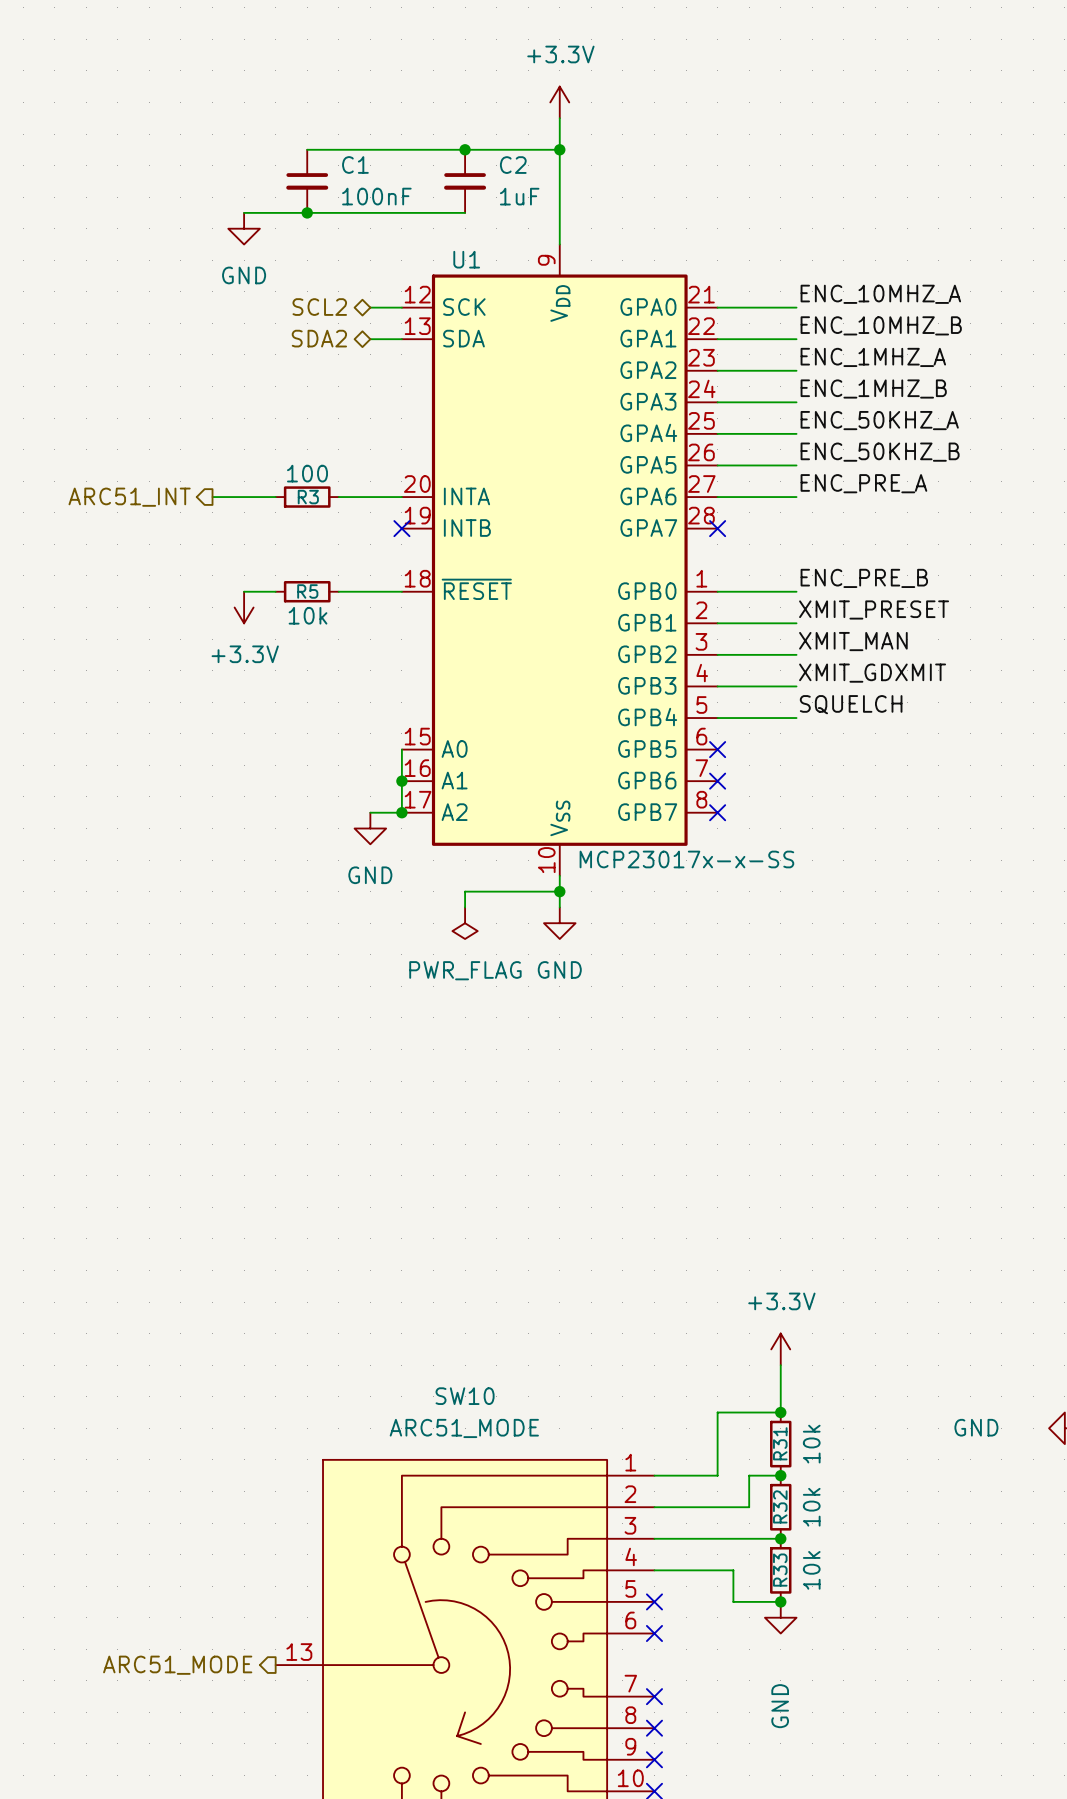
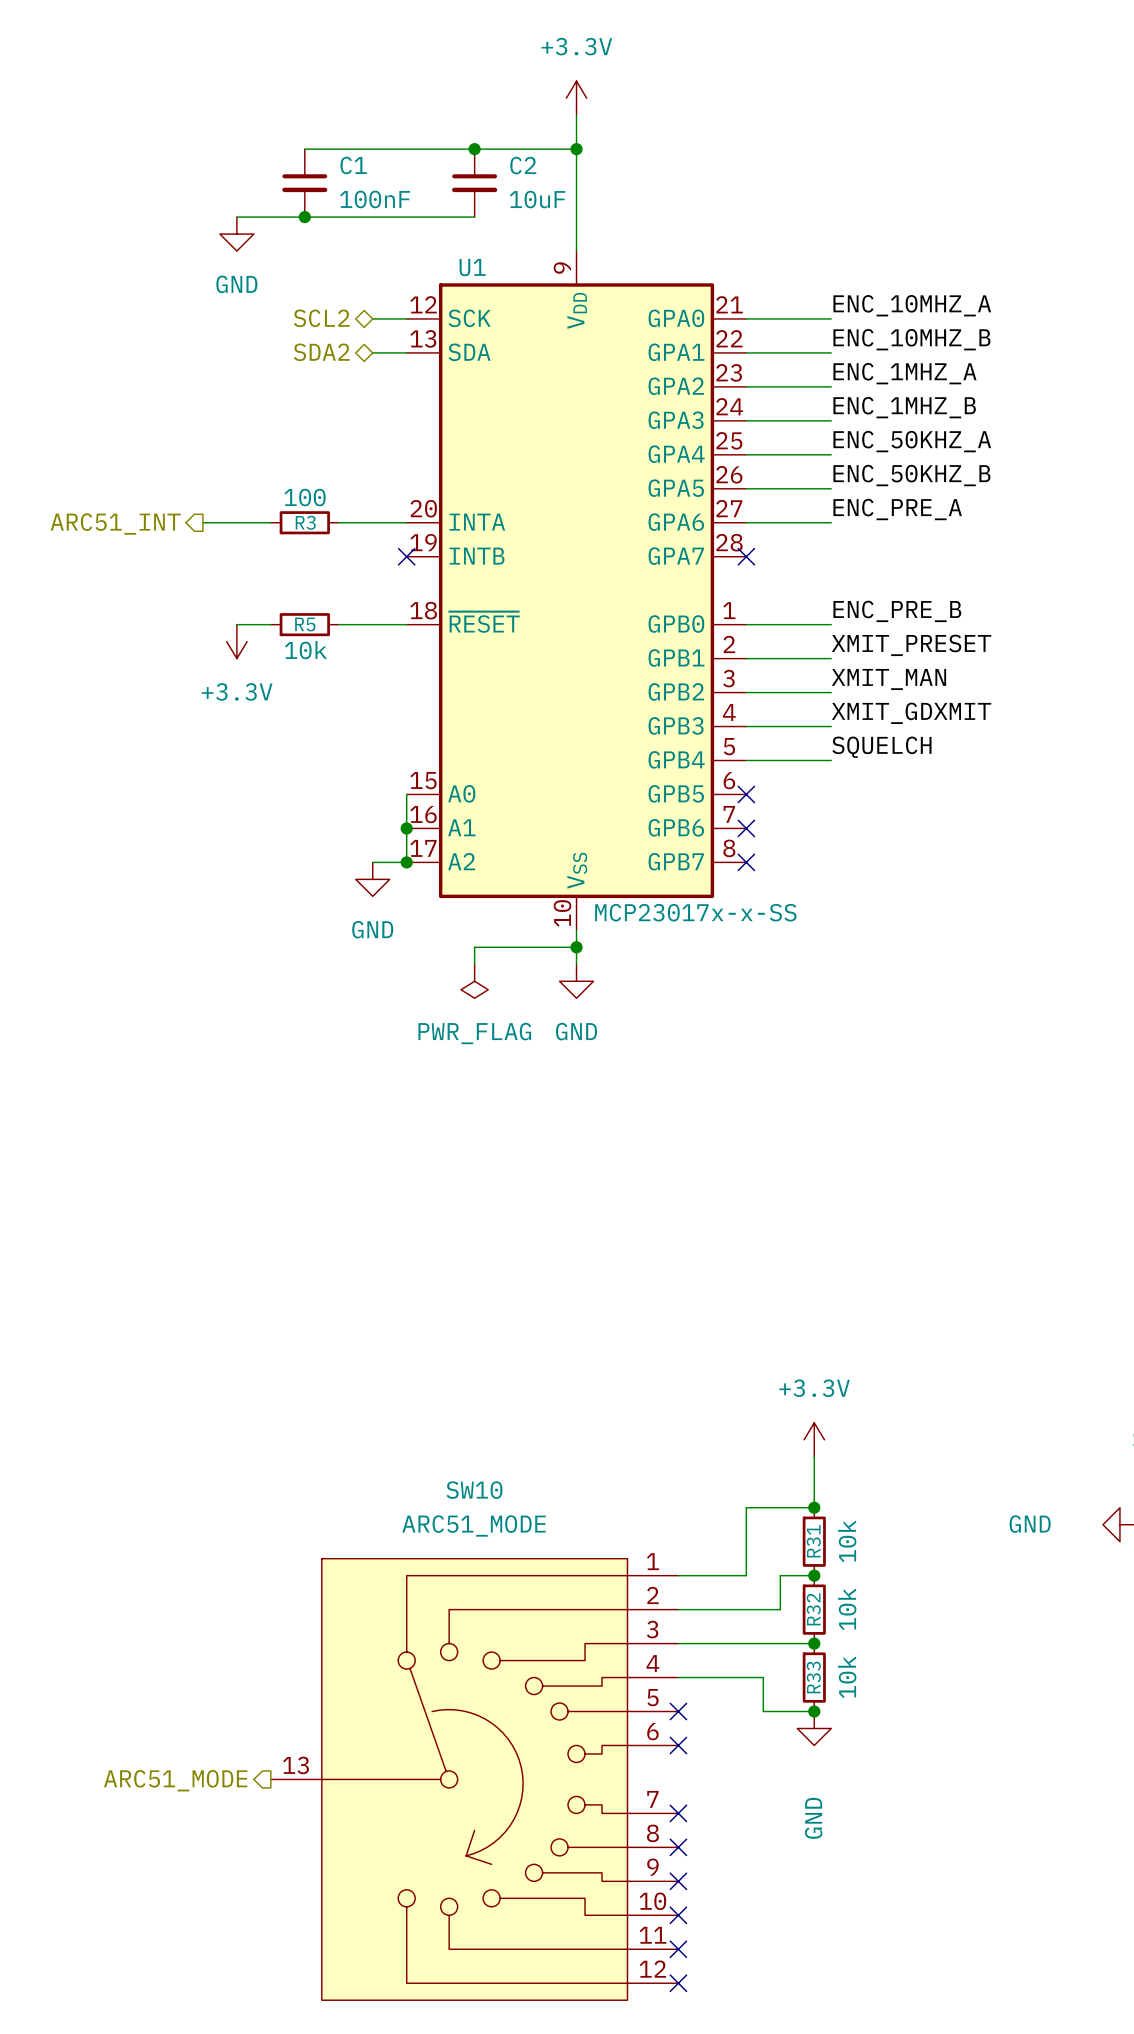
C2 value: 1uF (519, 196) -> 10uF (537, 199)

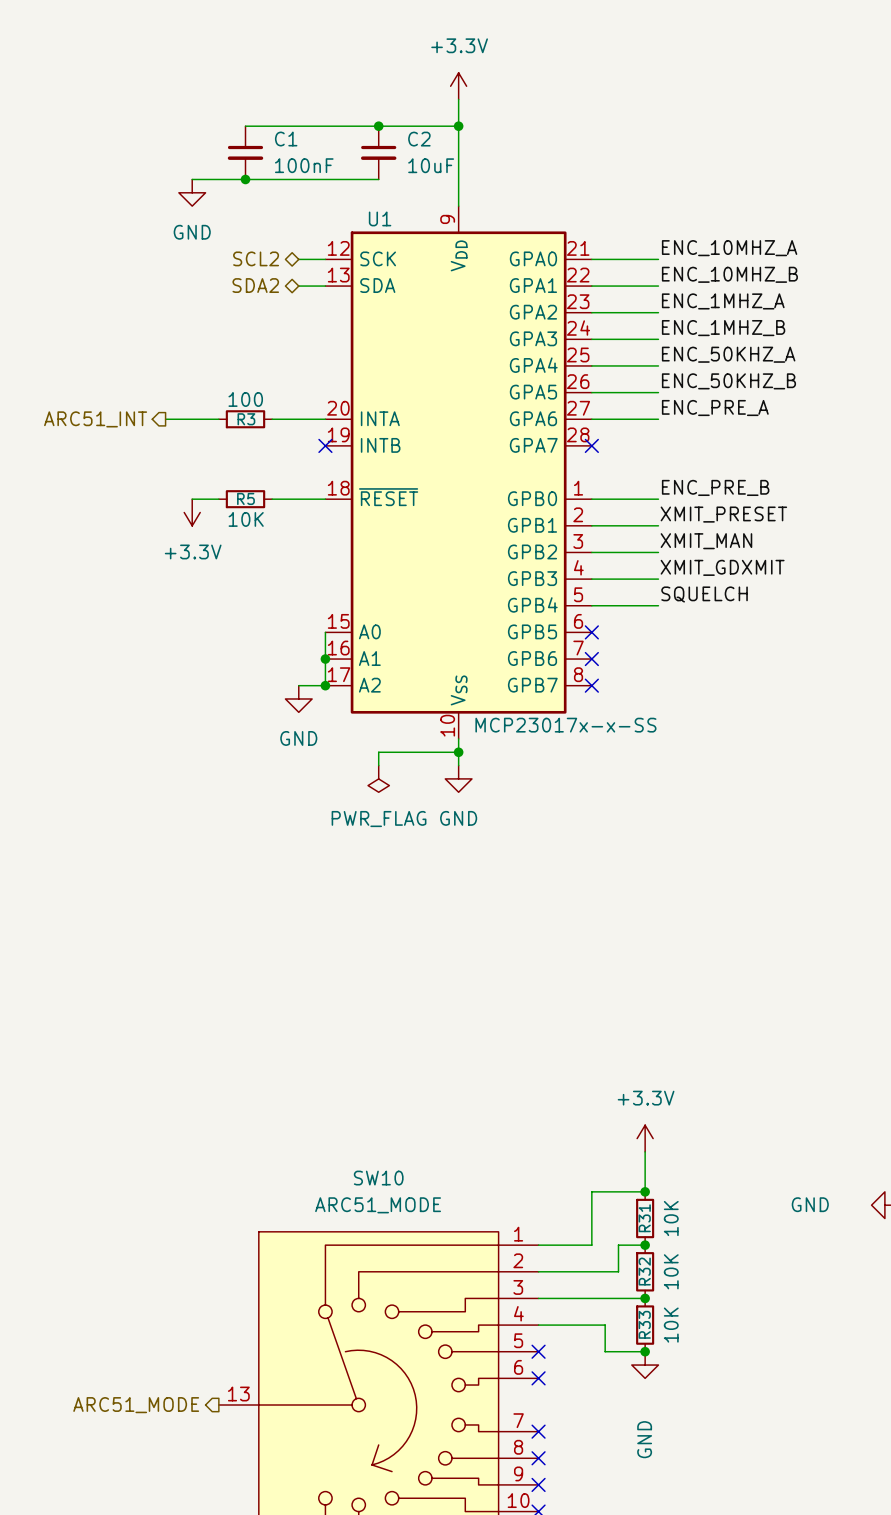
R5 value: 10k (305, 650) -> 10K (246, 519)
R31 value: 10k (847, 1541) -> 10K (671, 1218)
R32 value: 10k (847, 1609) -> 10K (671, 1271)
R33 value: 10k (847, 1677) -> 10K (671, 1325)

